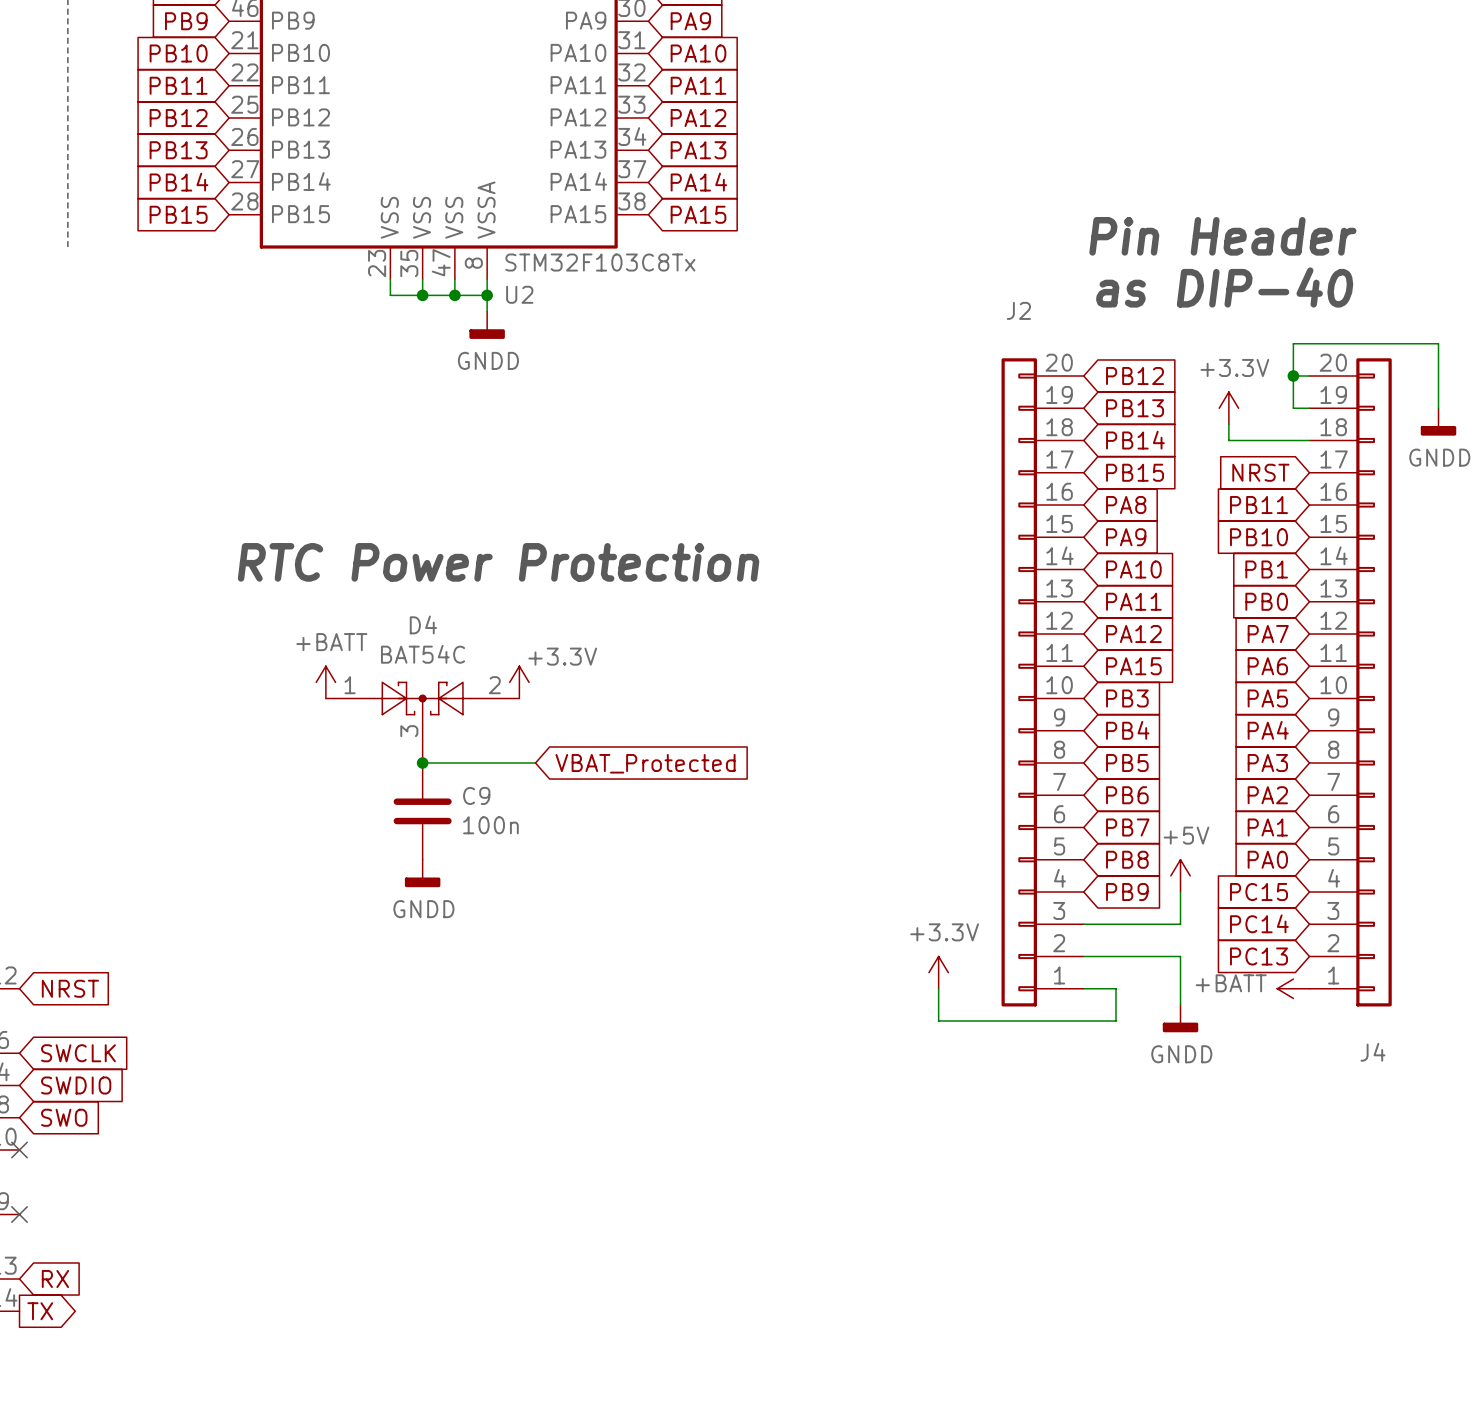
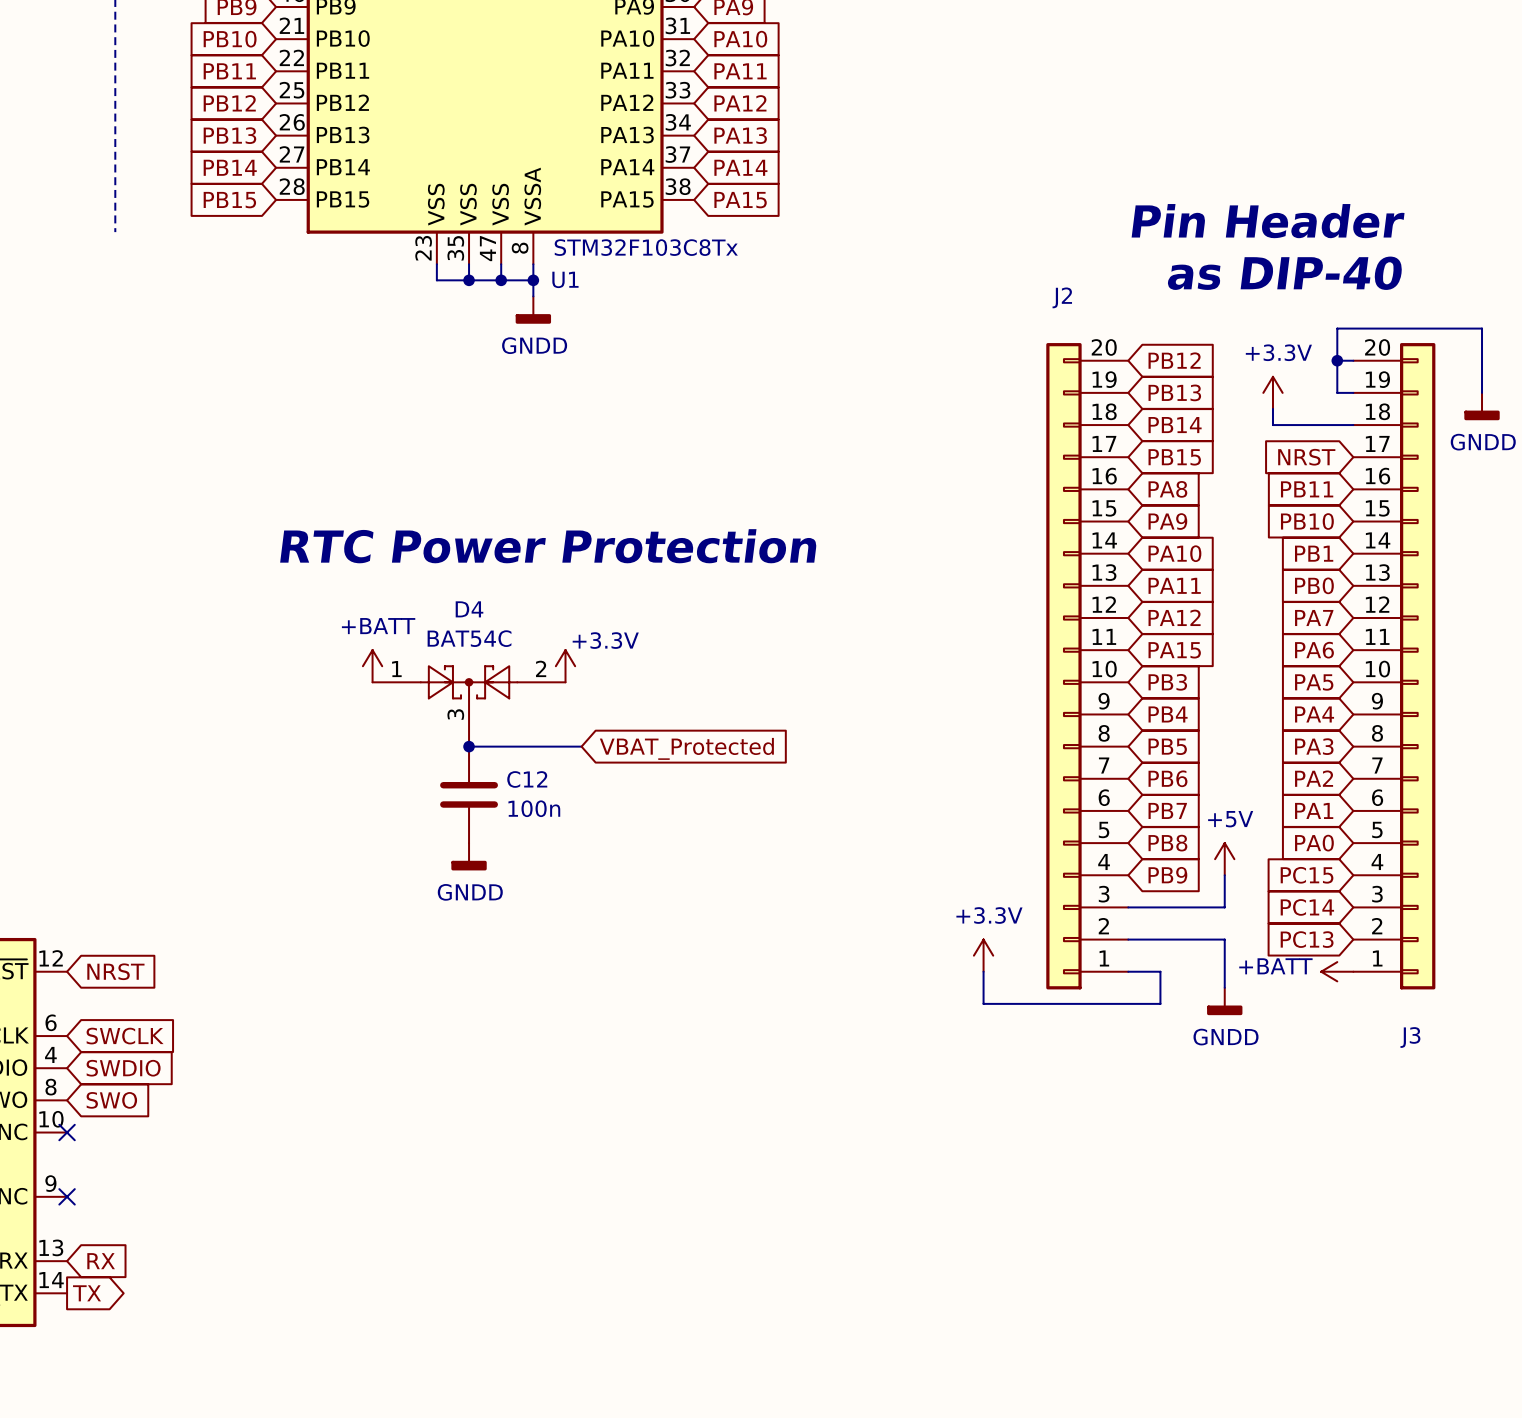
U2 name: U2 (519, 294) -> U1 (565, 279)
C9 name: C9 (476, 795) -> C12 (527, 779)
J4 name: J4 (1372, 1052) -> J3 (1410, 1037)

